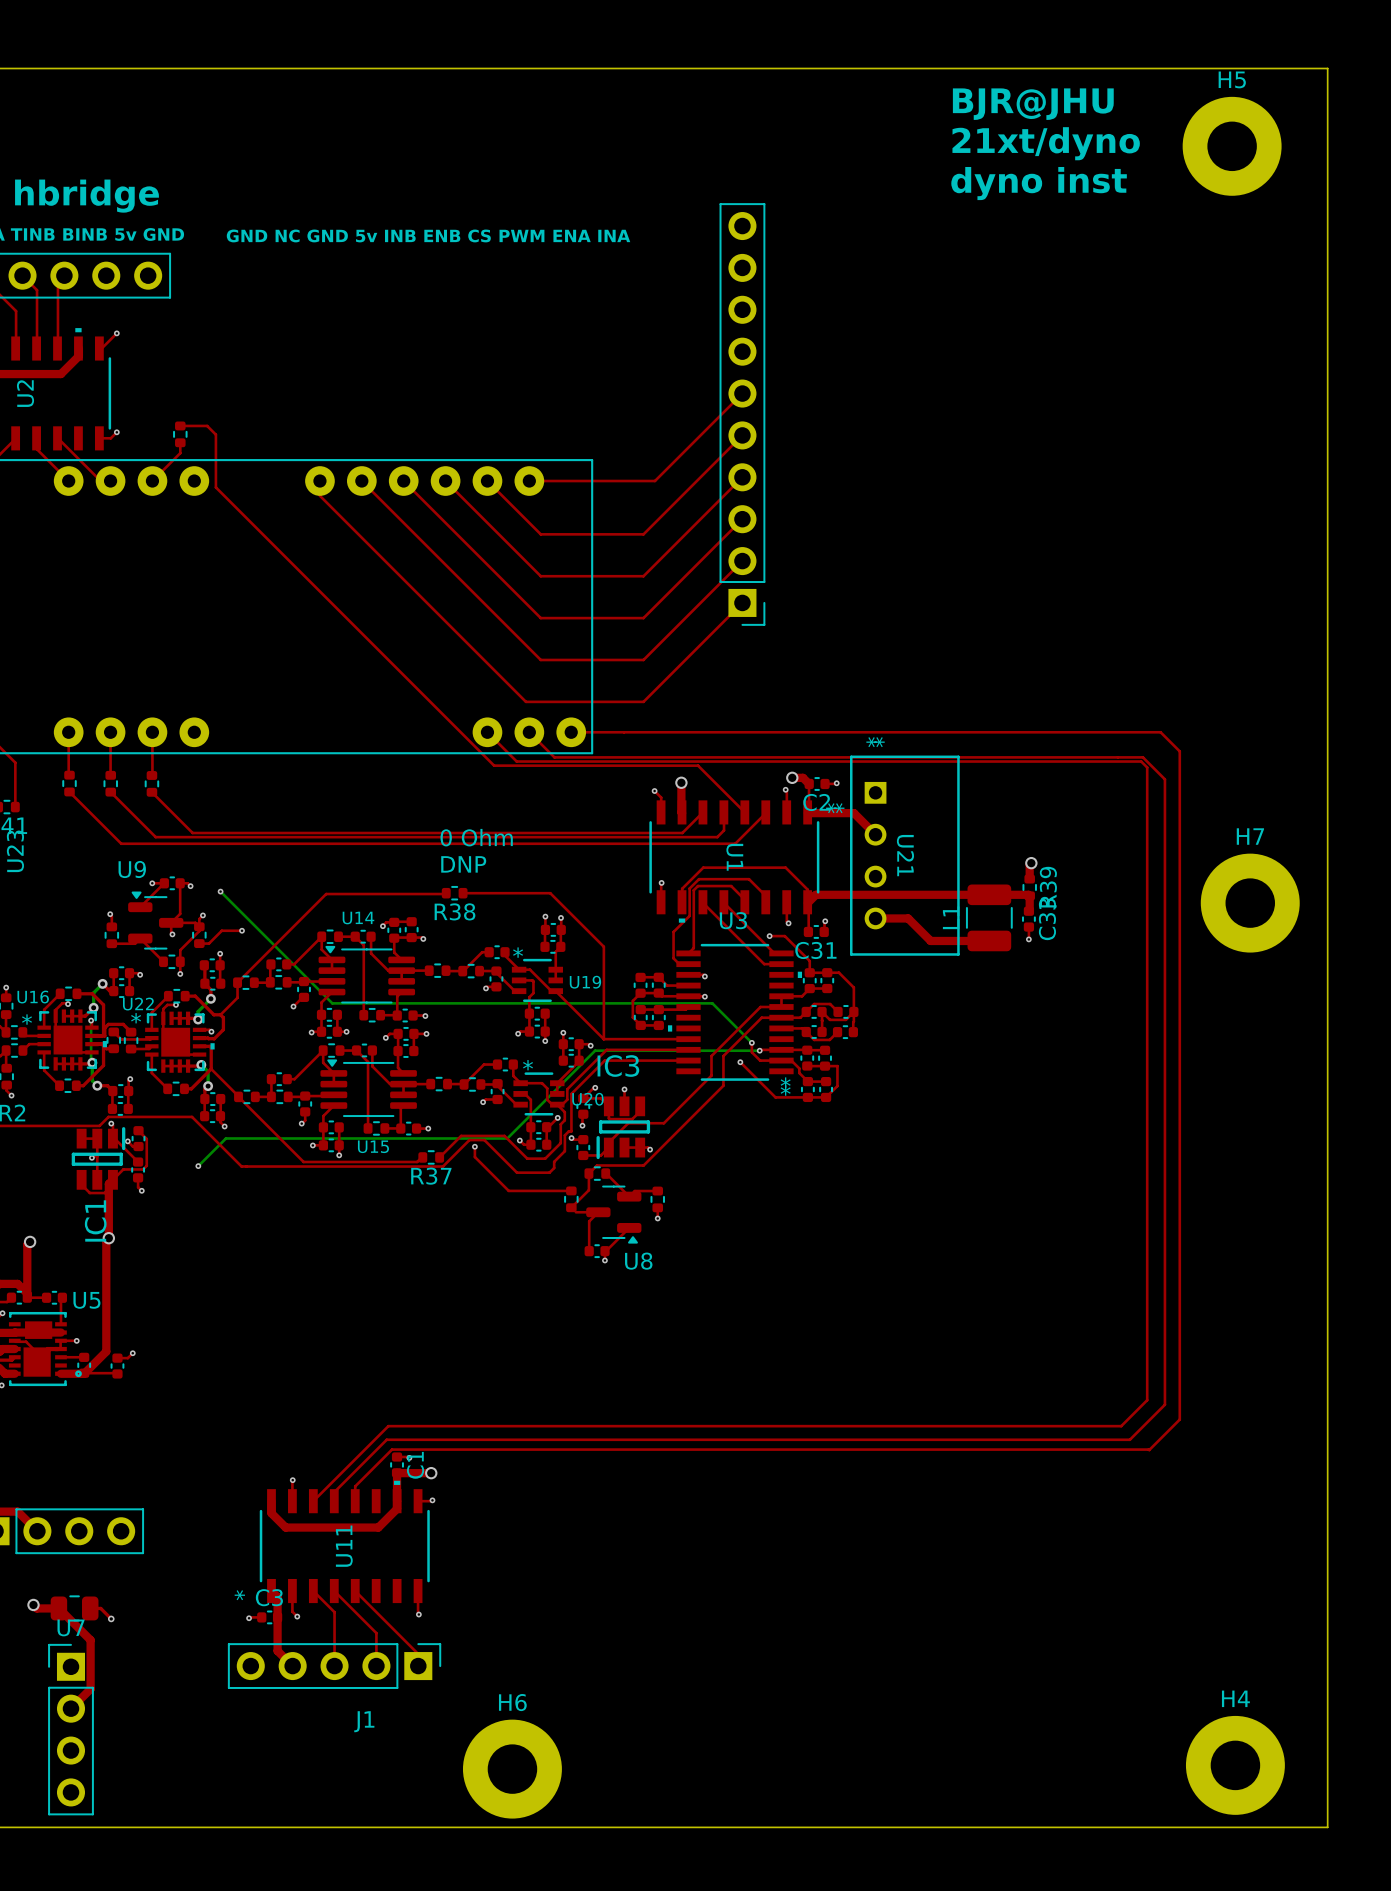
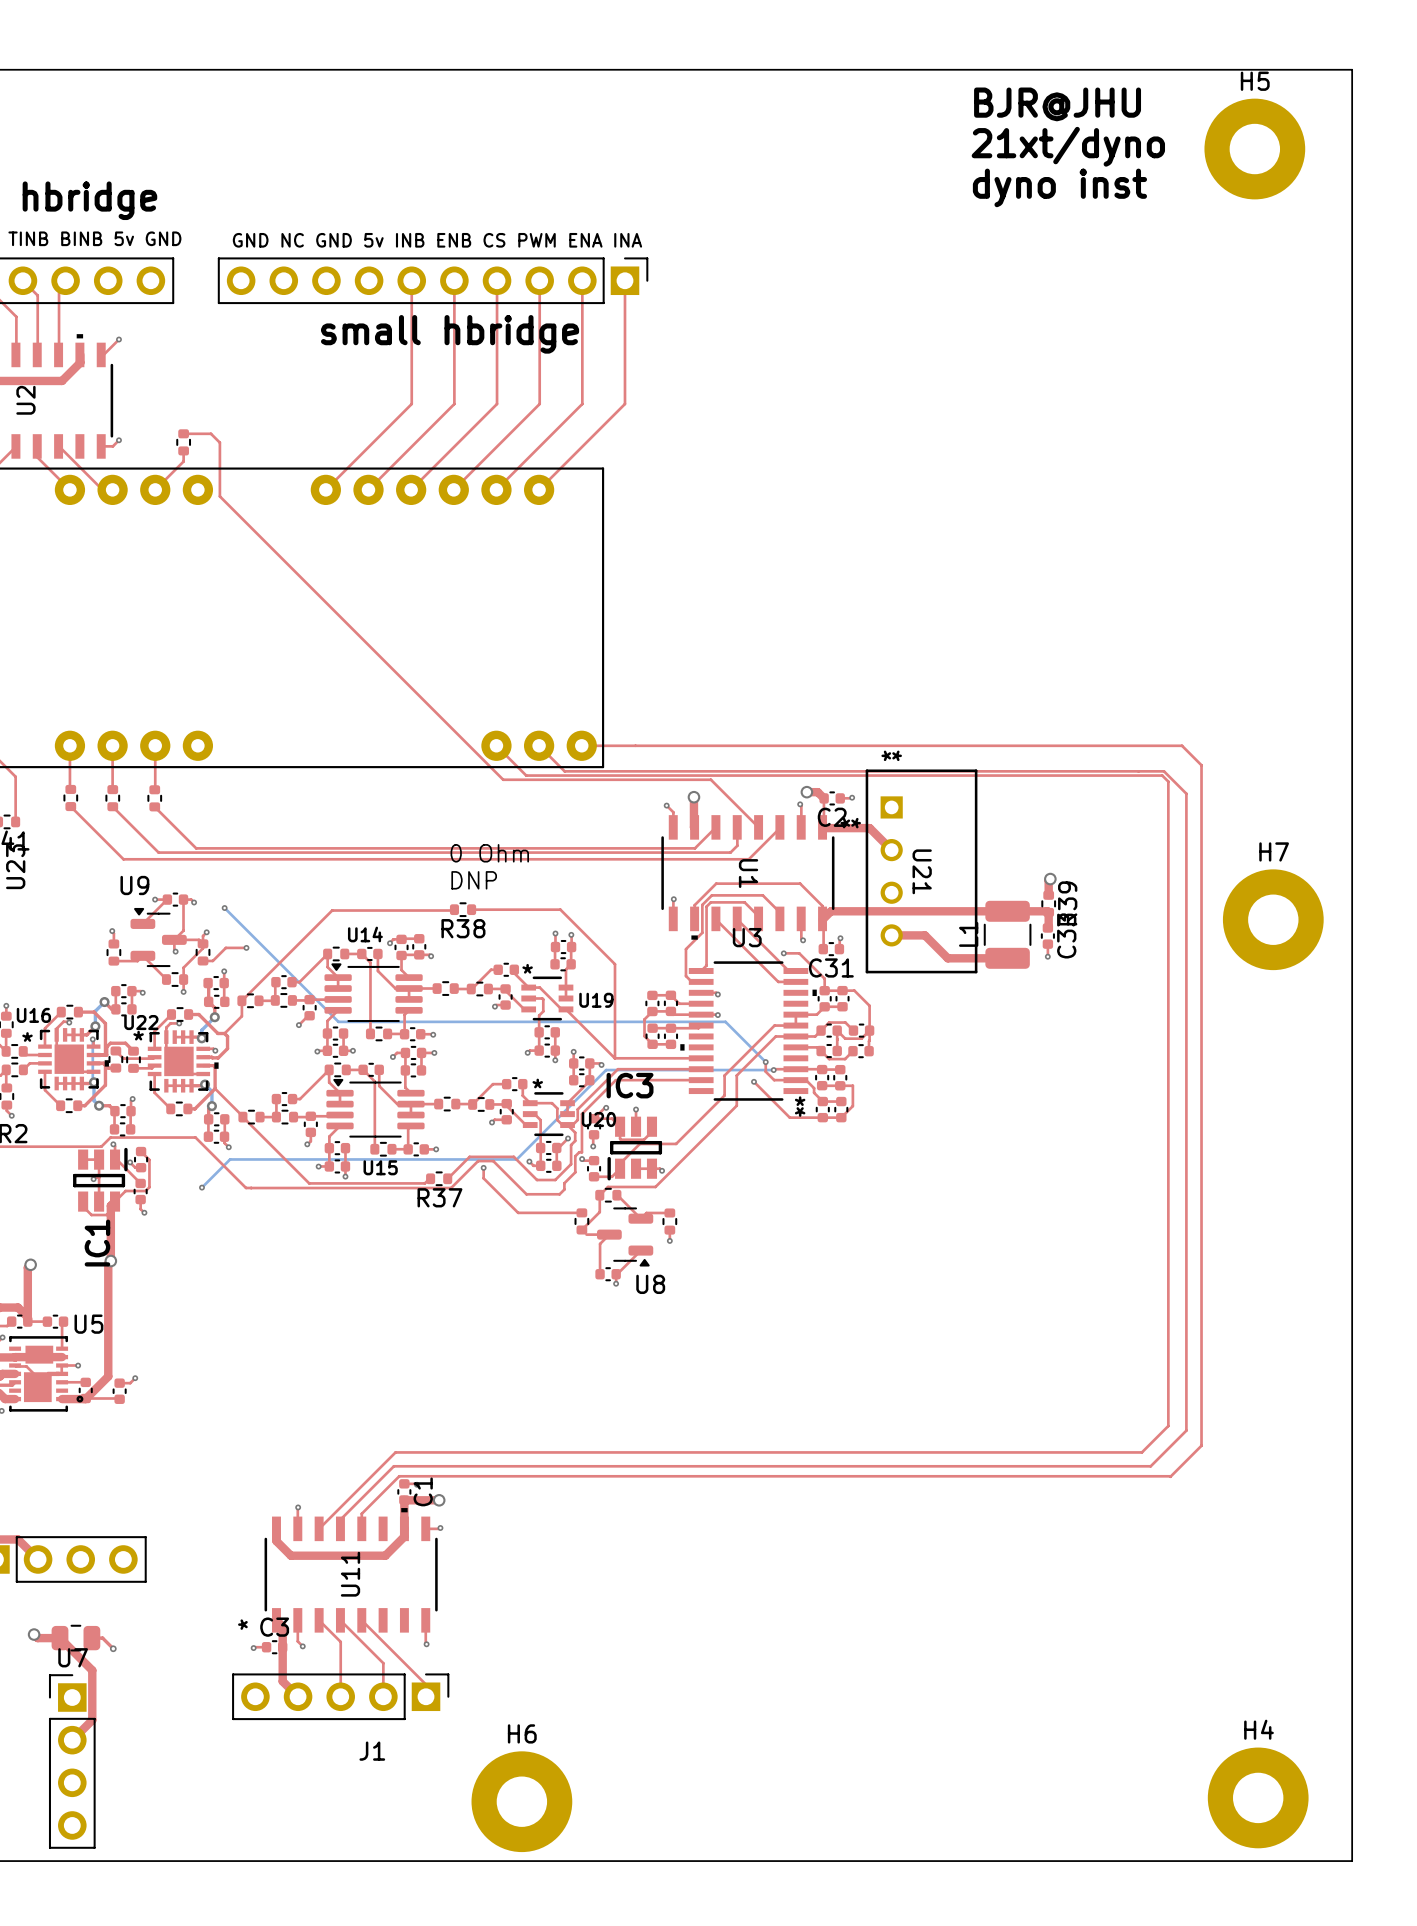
text: none -> small hbridge (450, 334)
top track: (742, 393) (654, 481) (529, 481) -> (624, 280) (624, 403) (539, 489)
part rotation: 0° (742, 414) -> 90° counterclockwise (433, 280)
part position: (742, 414) -> (433, 280)
top track: (742, 435) (643, 534) (540, 534) (487, 481) -> (582, 280) (582, 403) (496, 489)
top track: (742, 477) (643, 576) (540, 576) (445, 481) -> (539, 280) (539, 403) (453, 489)
top track: (319, 481) (319, 495) (525, 701) (643, 701) (742, 602) -> (325, 489) (411, 403) (411, 280)
top track: (361, 481) (540, 659) (643, 659) (742, 561) -> (368, 489) (454, 403) (454, 280)
top track: (403, 481) (540, 618) (643, 618) (742, 519) -> (411, 489) (497, 403) (497, 280)

